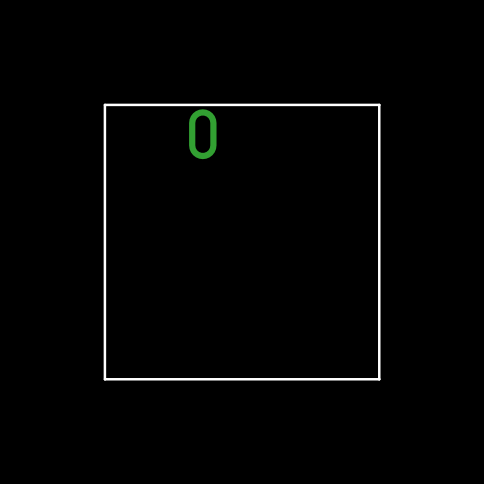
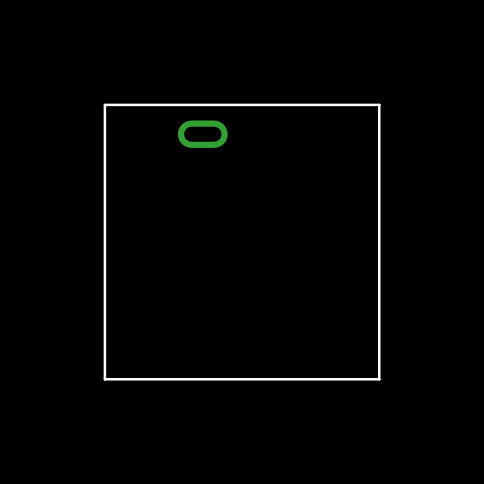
part rotation: 0° (202, 134) -> 90° clockwise (202, 134)

